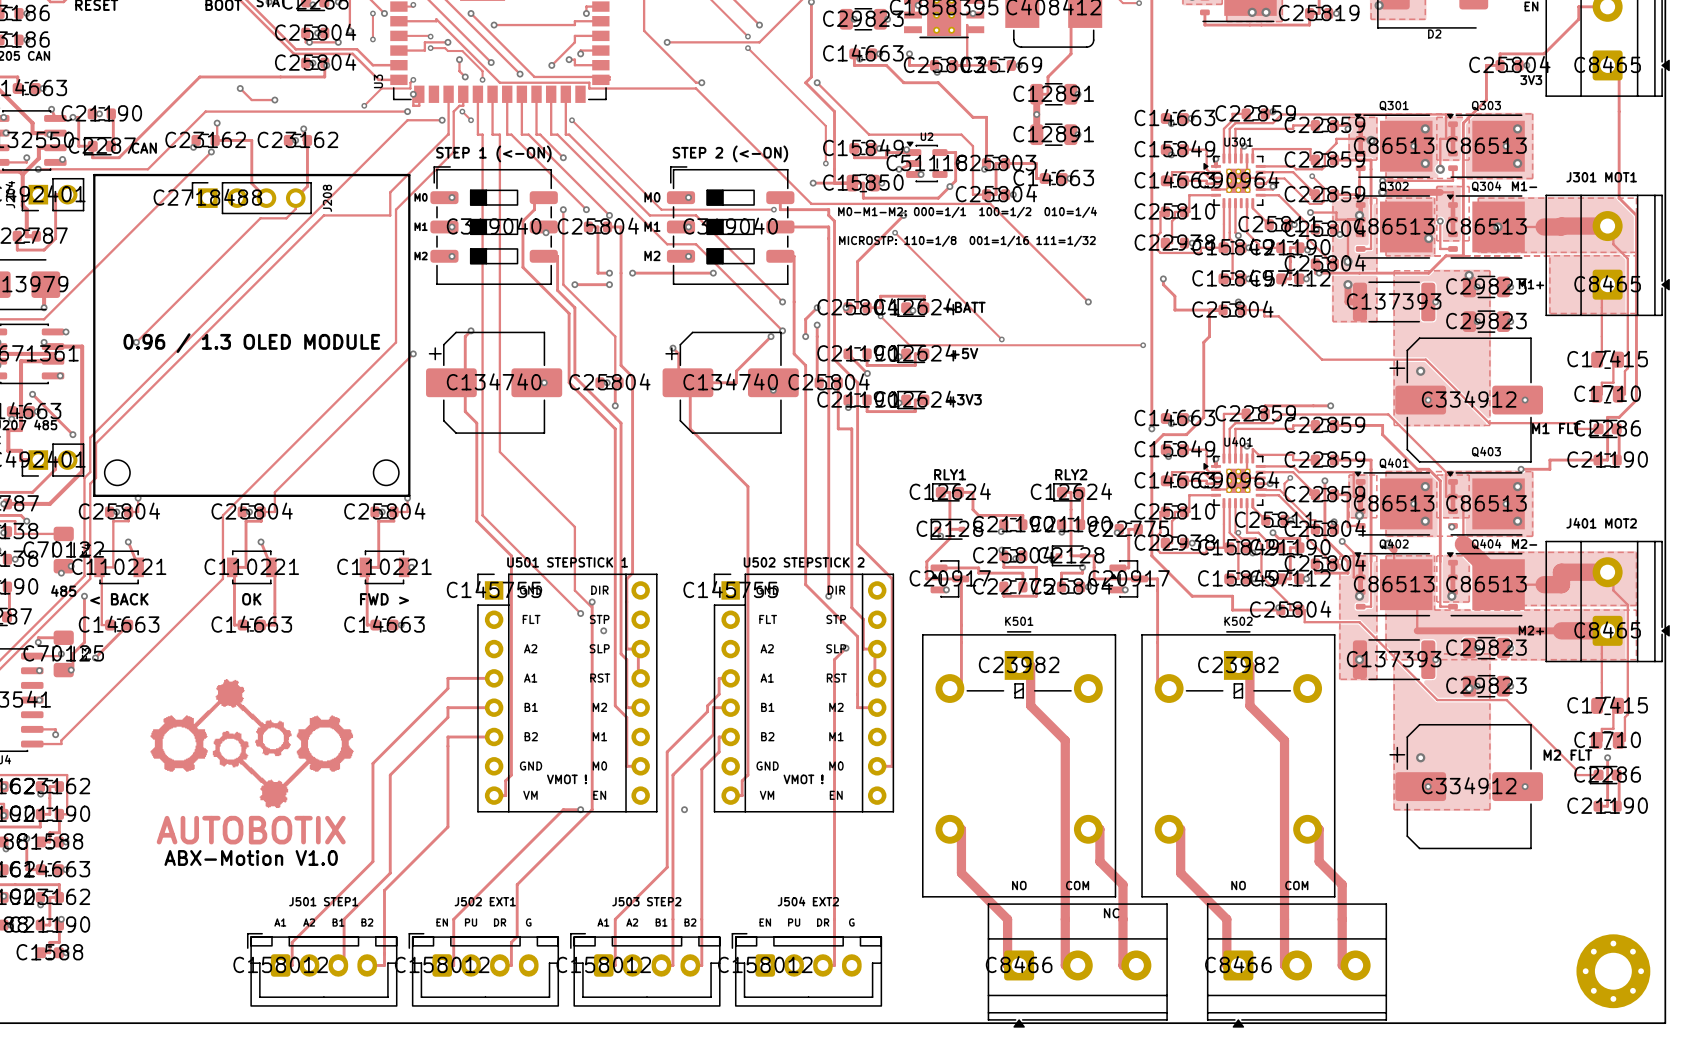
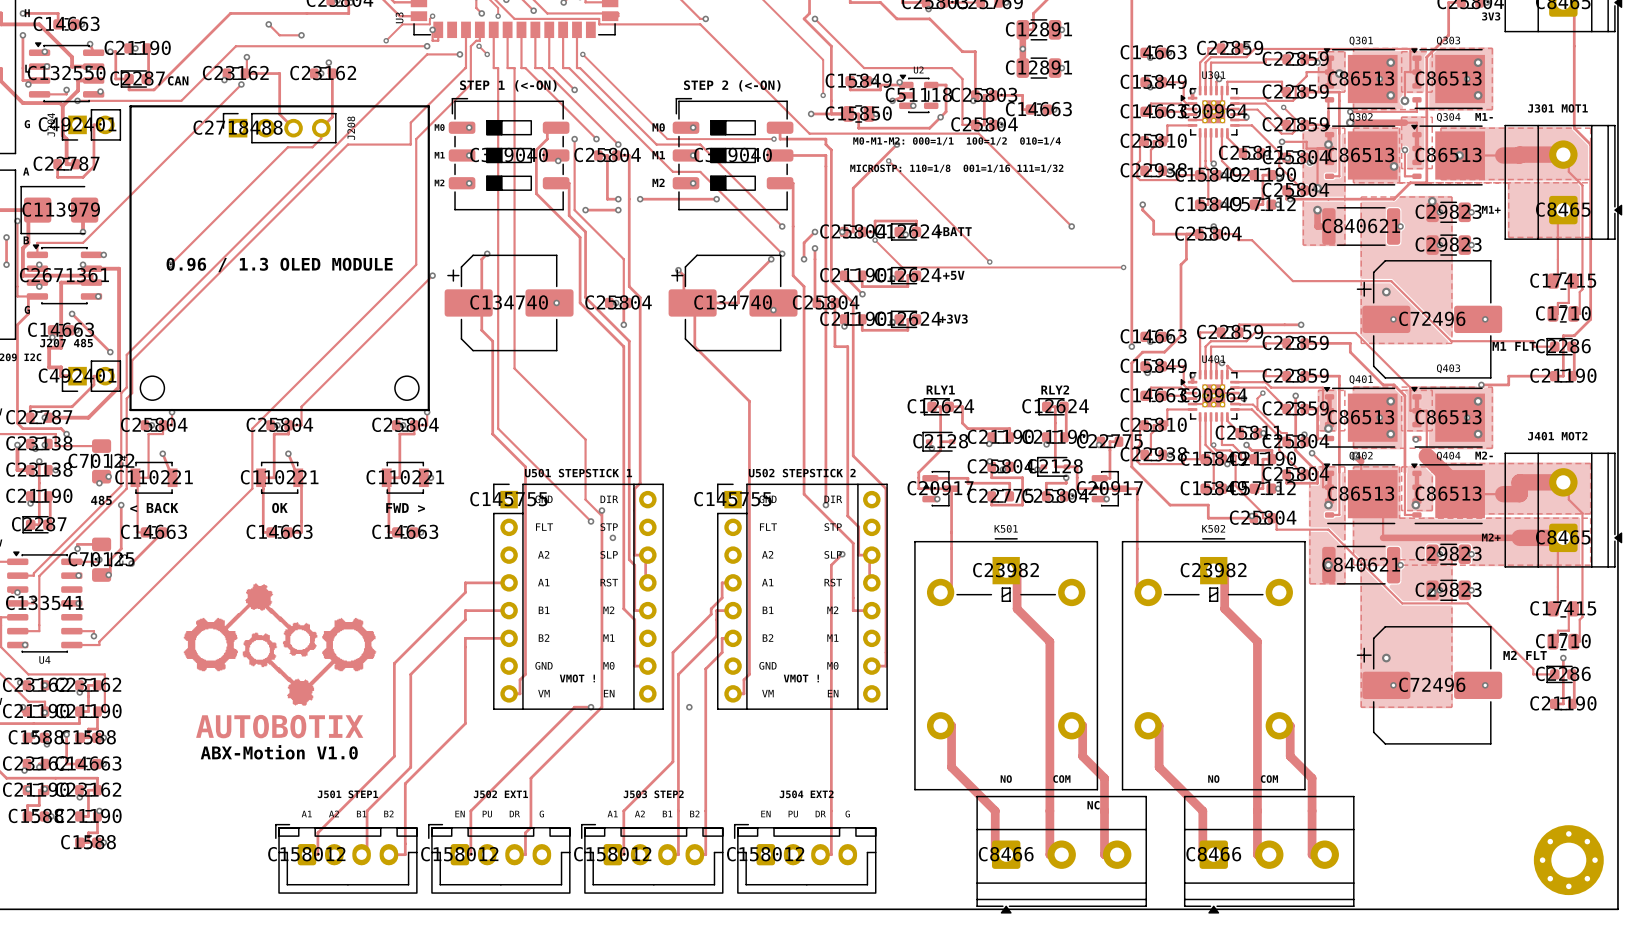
part text: C137393 (1394, 301) -> C840621 (1361, 225)
part text: C334912 (1469, 399) -> C72496 (1432, 318)
part text: C137393 (1394, 659) -> C840621 (1361, 564)
part text: C334912 (1469, 785) -> C72496 (1432, 684)

